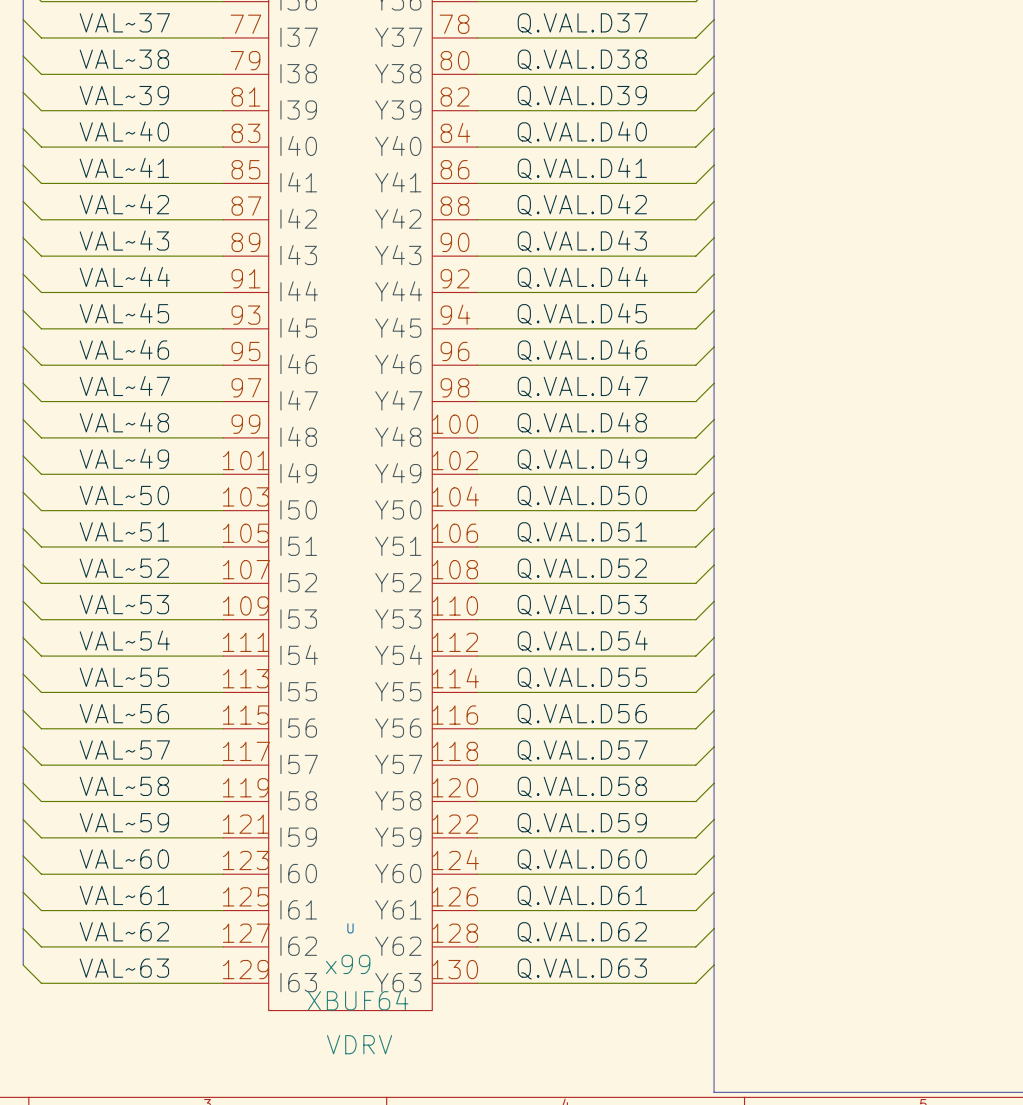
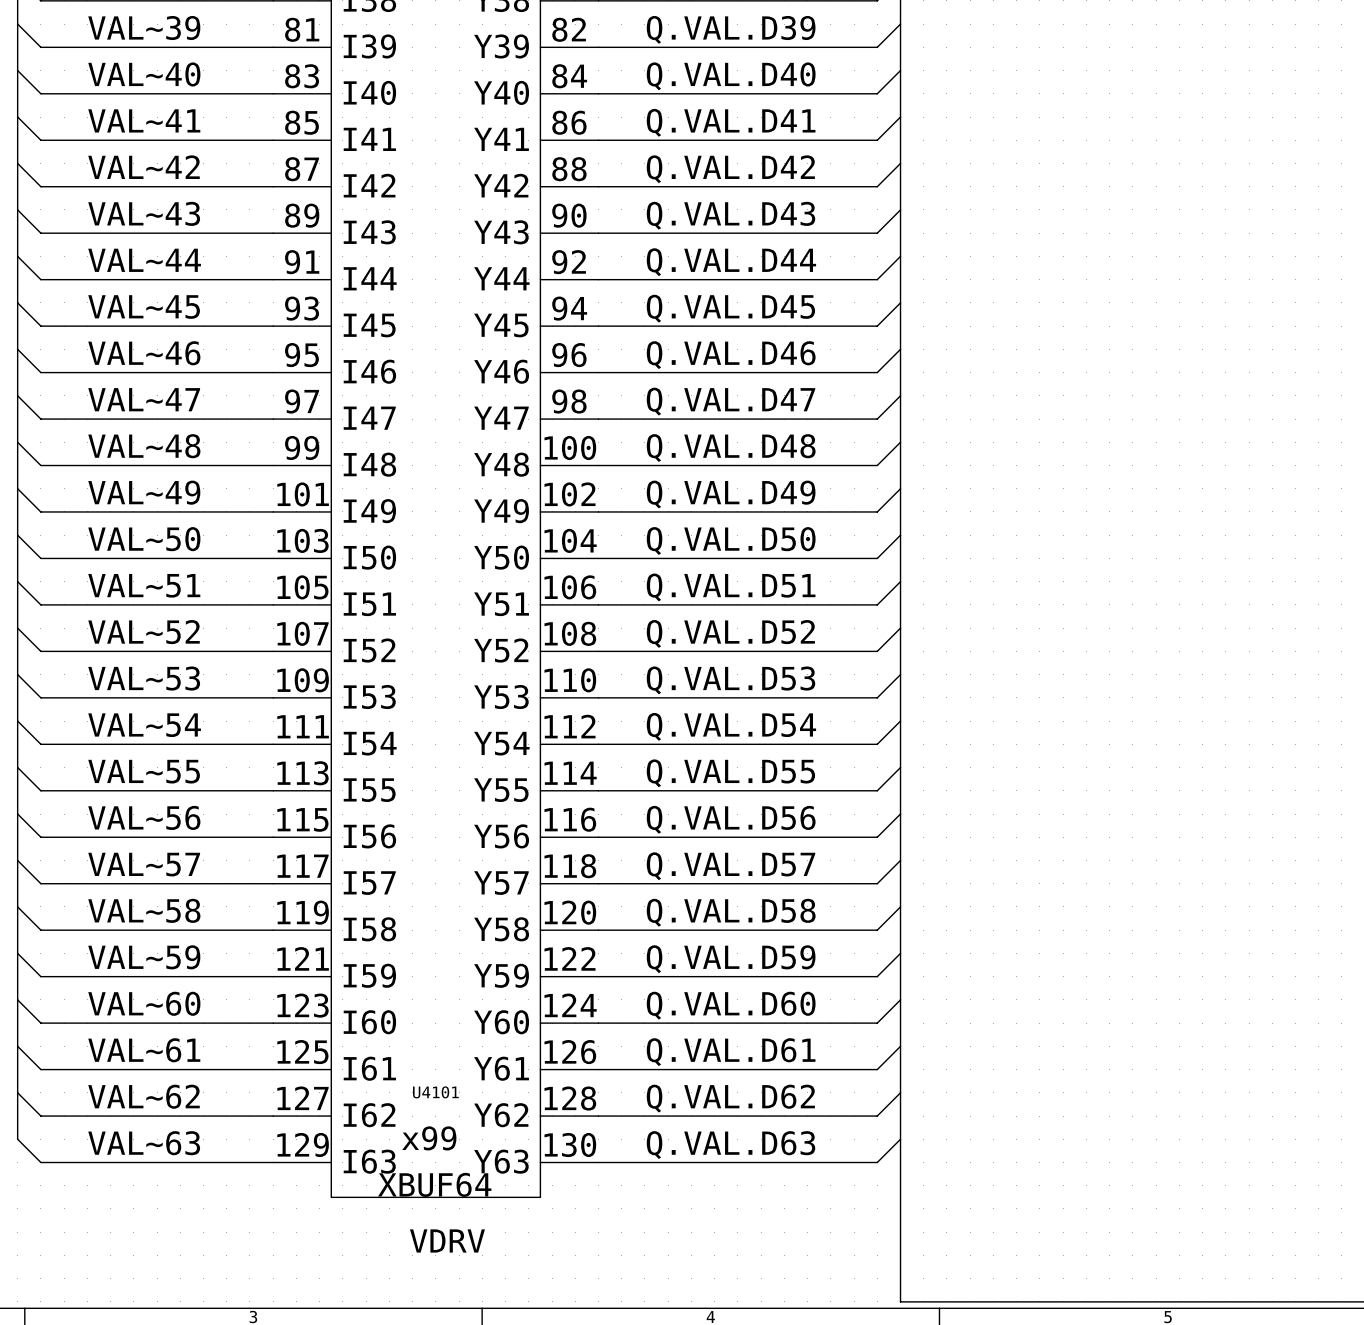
U name: U (350, 928) -> U4101 (435, 1092)

